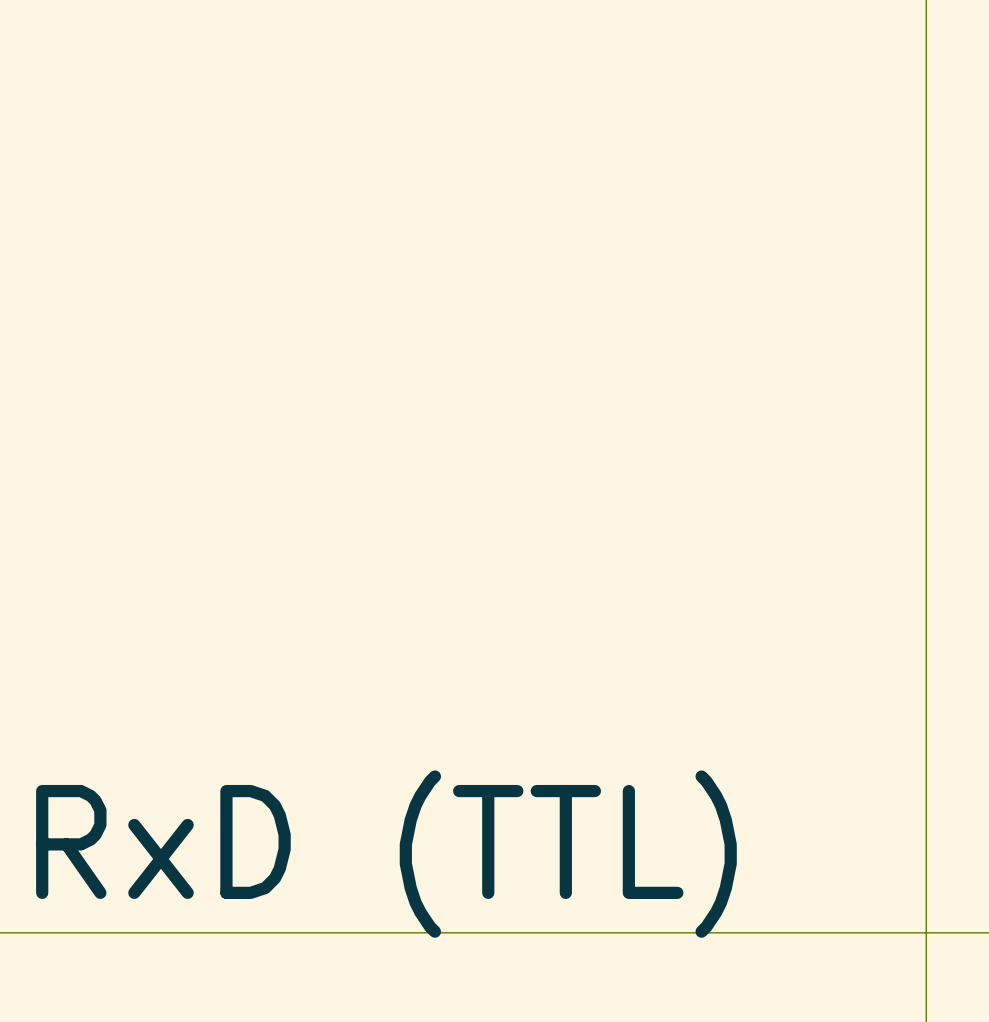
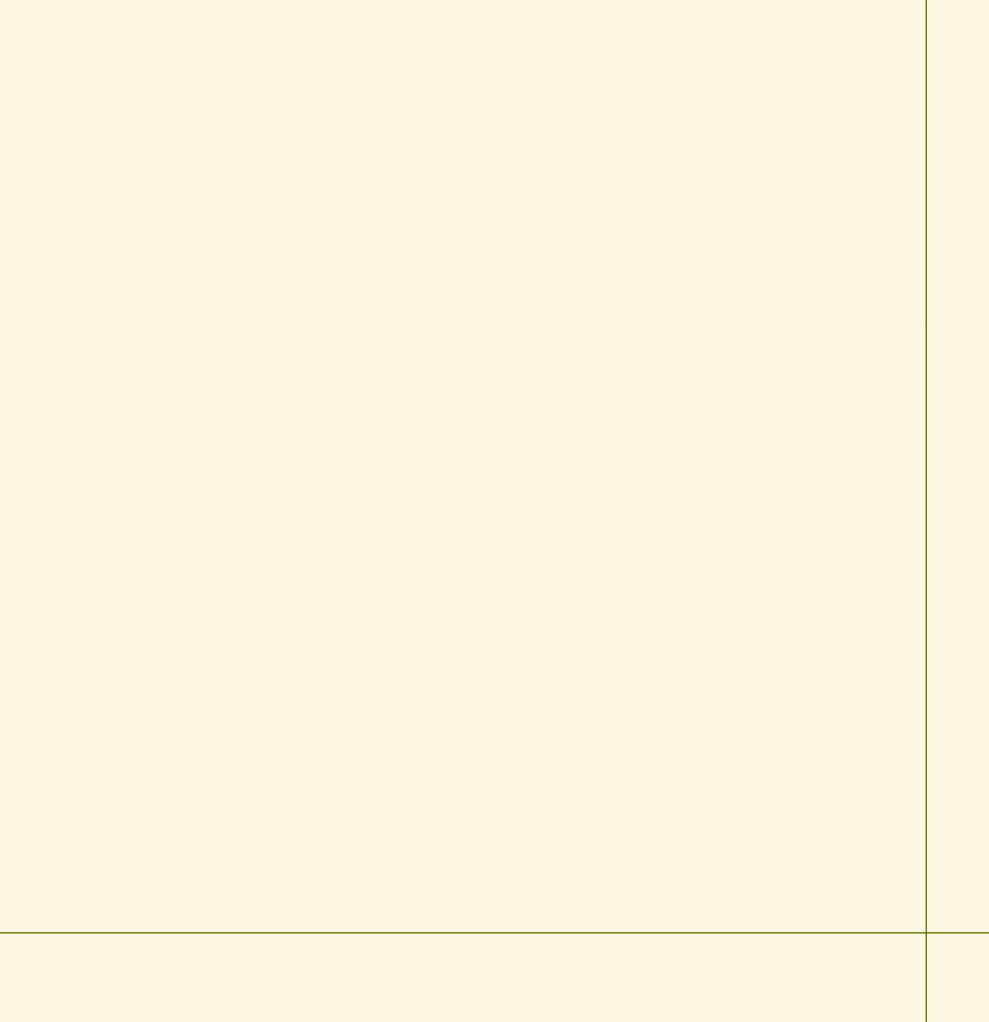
label: RxD (TTL) (386, 854) -> none

